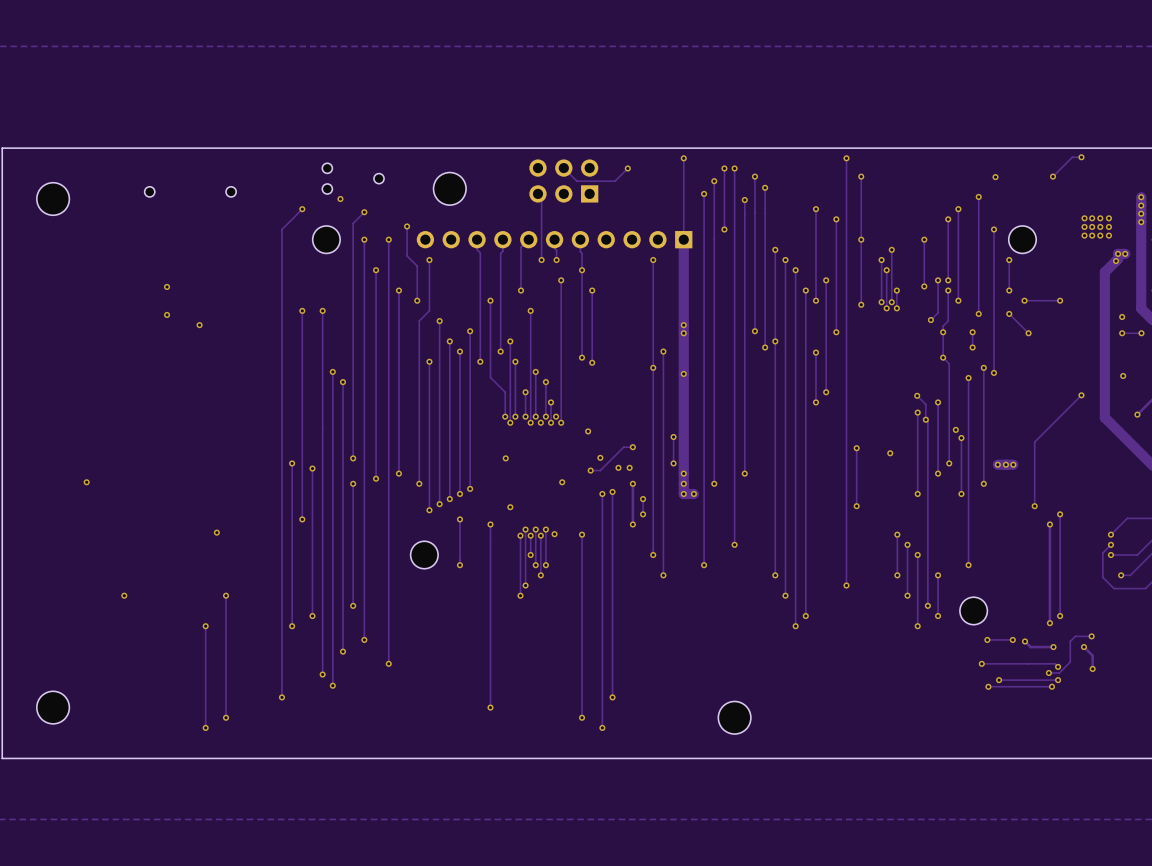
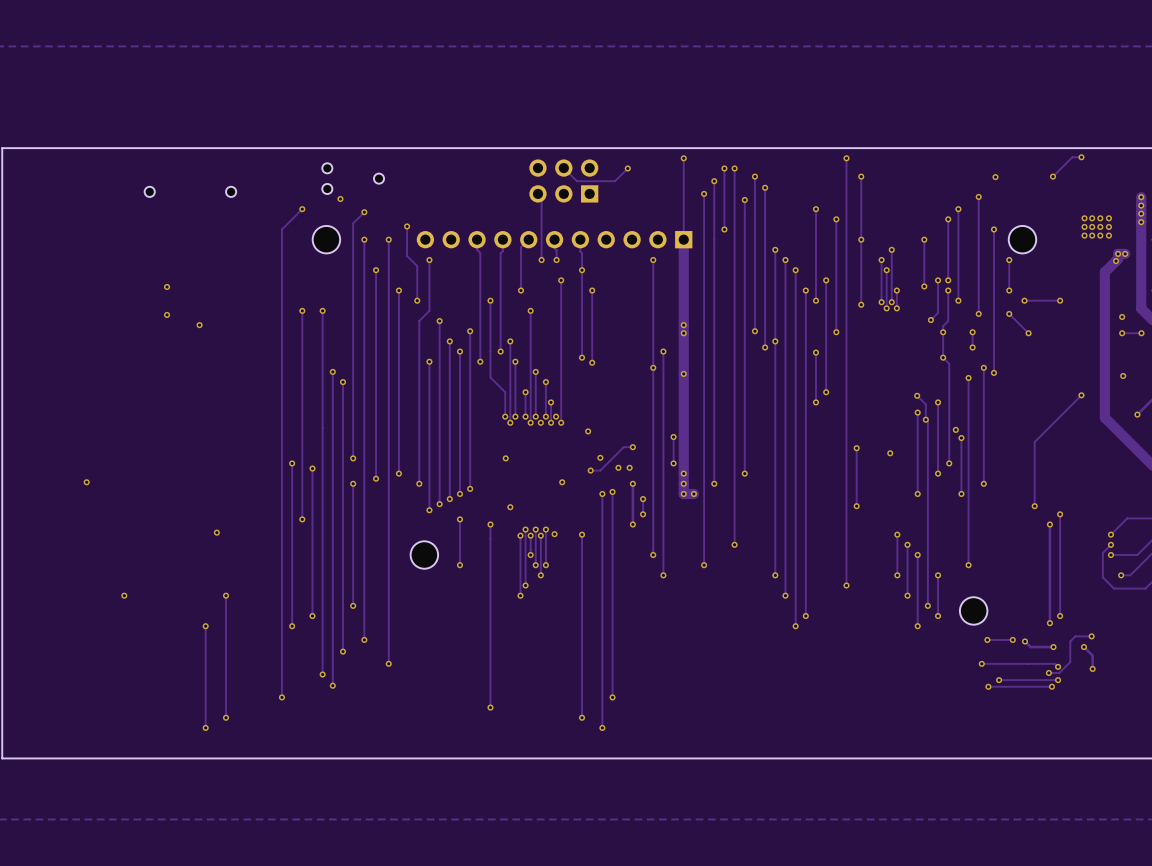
part: (449, 188) -> none
part: (53, 198) -> none
via: (997, 464) -> none
via: (1005, 464) -> none
track: (1013, 464) (997, 464) -> none
via: (1013, 464) -> none
part: (53, 707) -> none
part: (734, 717) -> none

